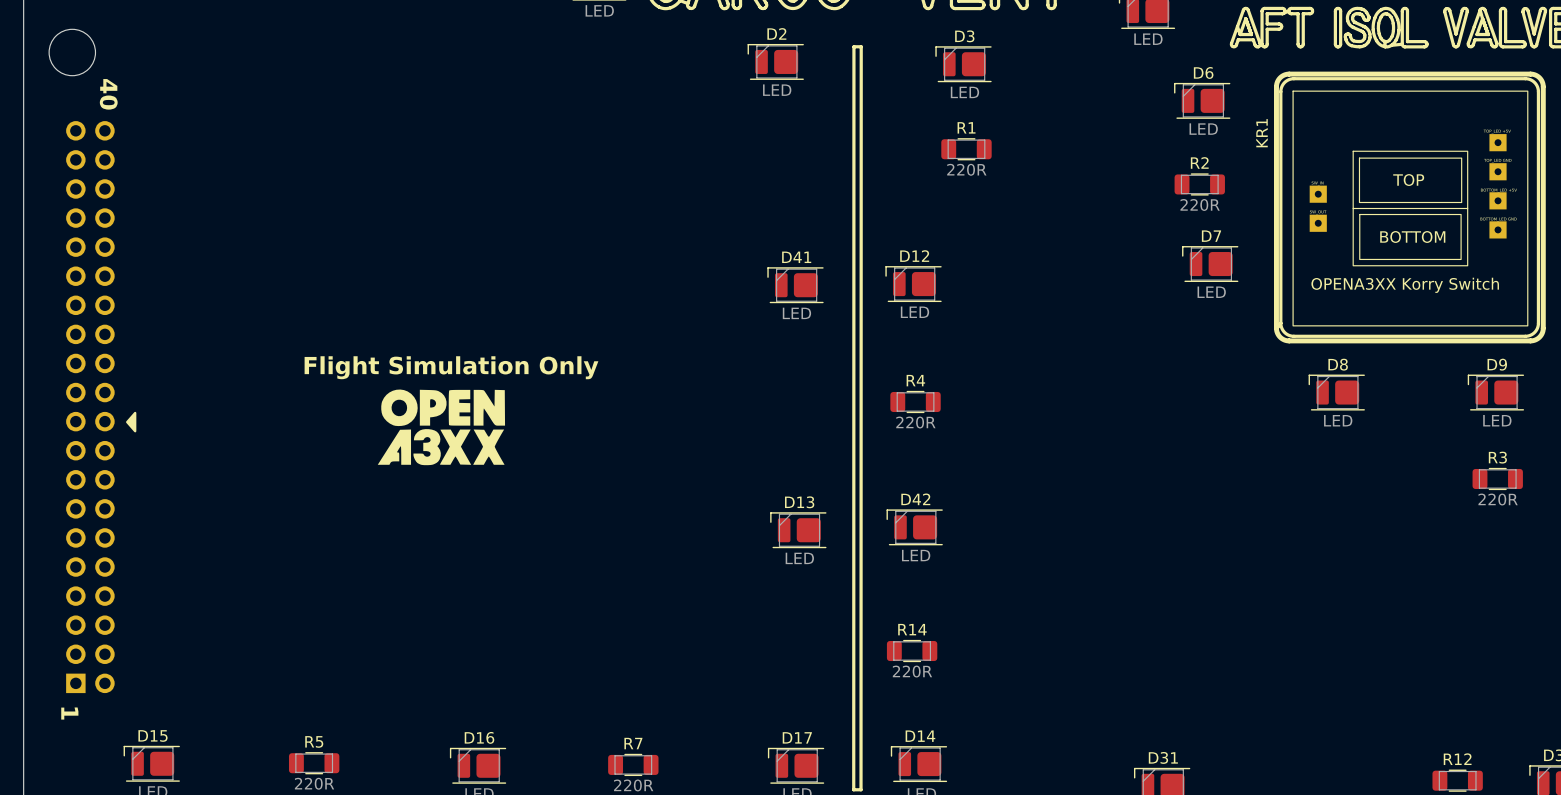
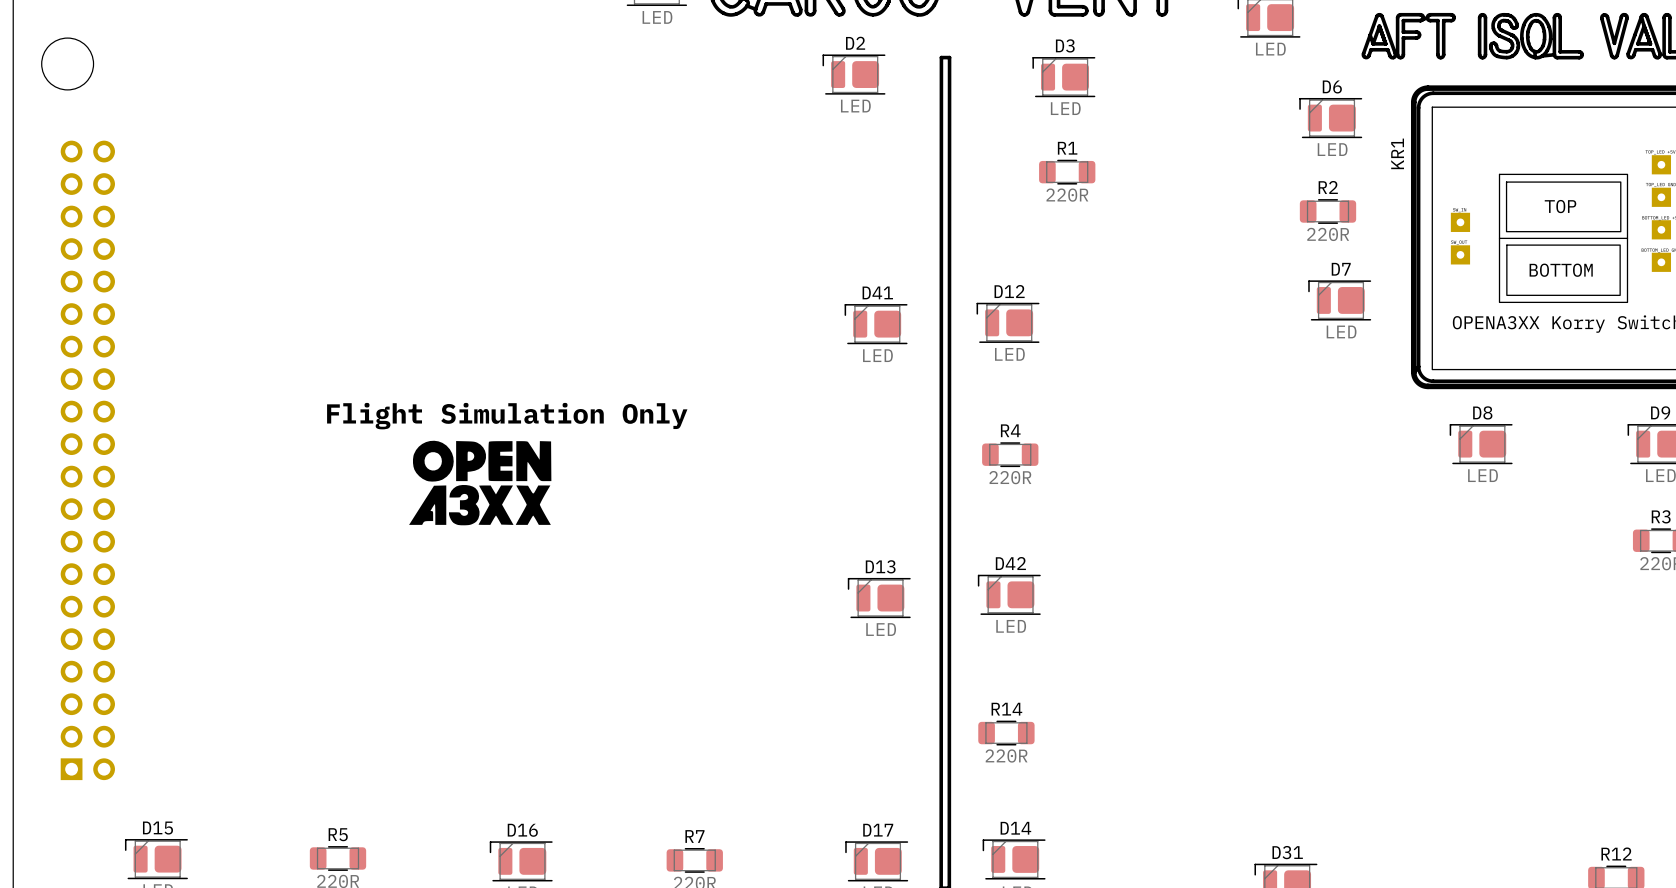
text: 40 (108, 94) -> none
drawing: [126, 411, 137, 433] -> none
text: 1 (69, 713) -> none

